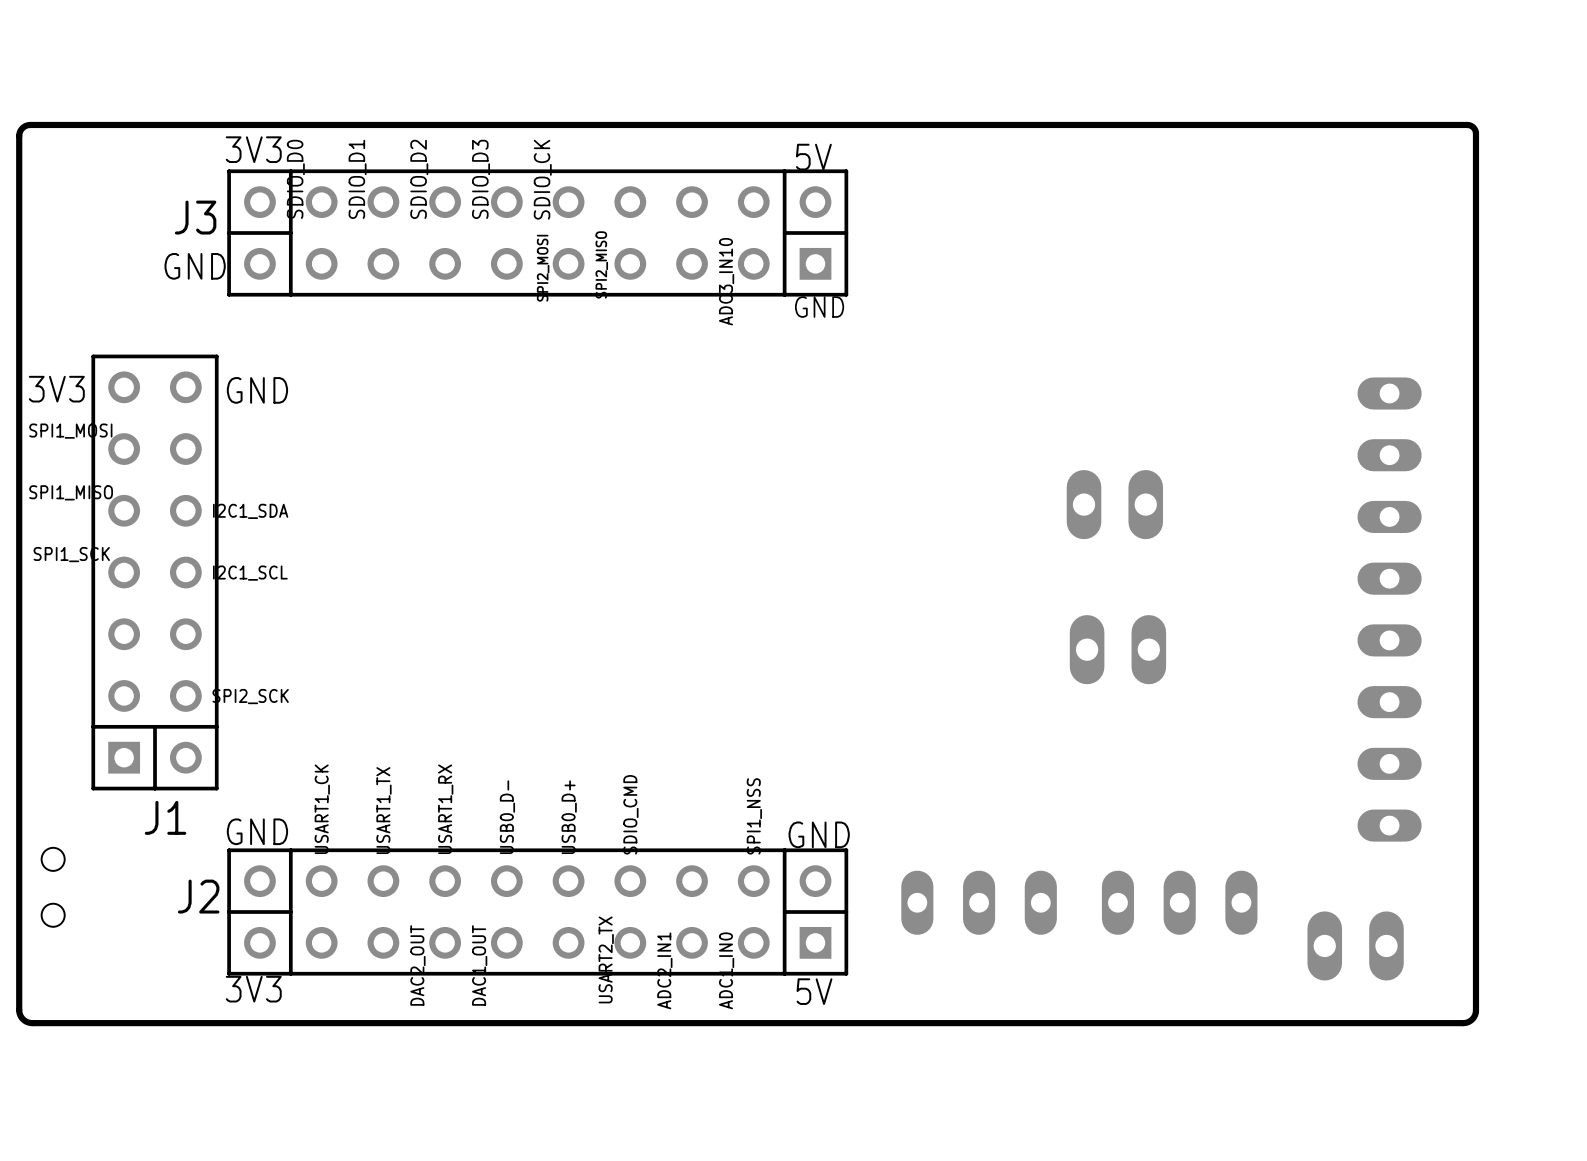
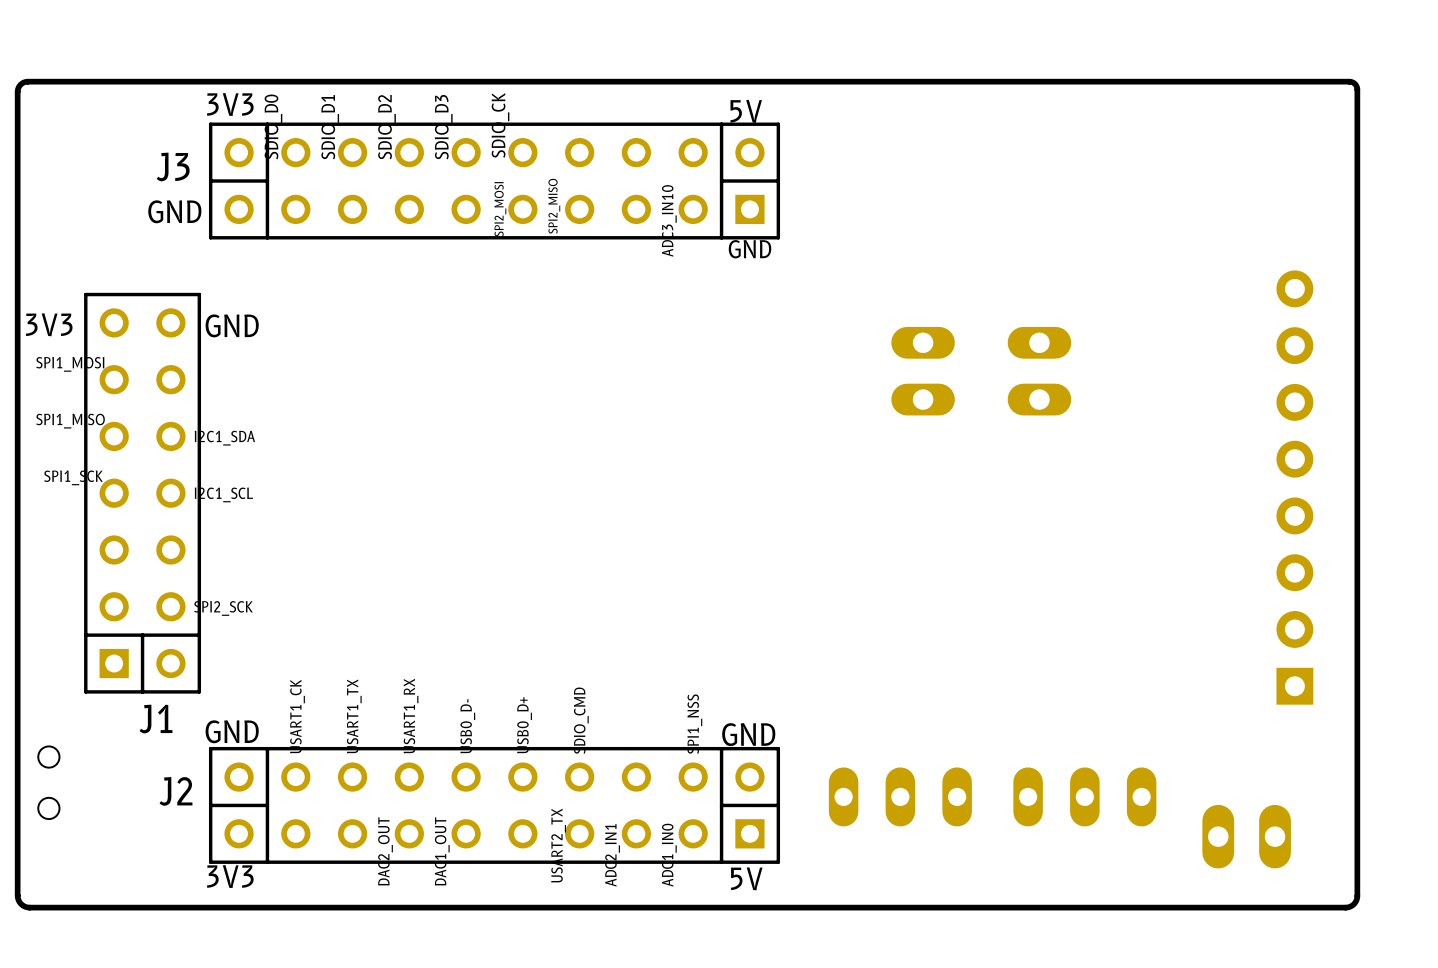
part: none -> (923, 371)
part: none -> (1039, 371)
part: (1114, 504) -> none
part: none -> (1294, 487)
part: (1389, 609) -> none
part: (1117, 649) -> none

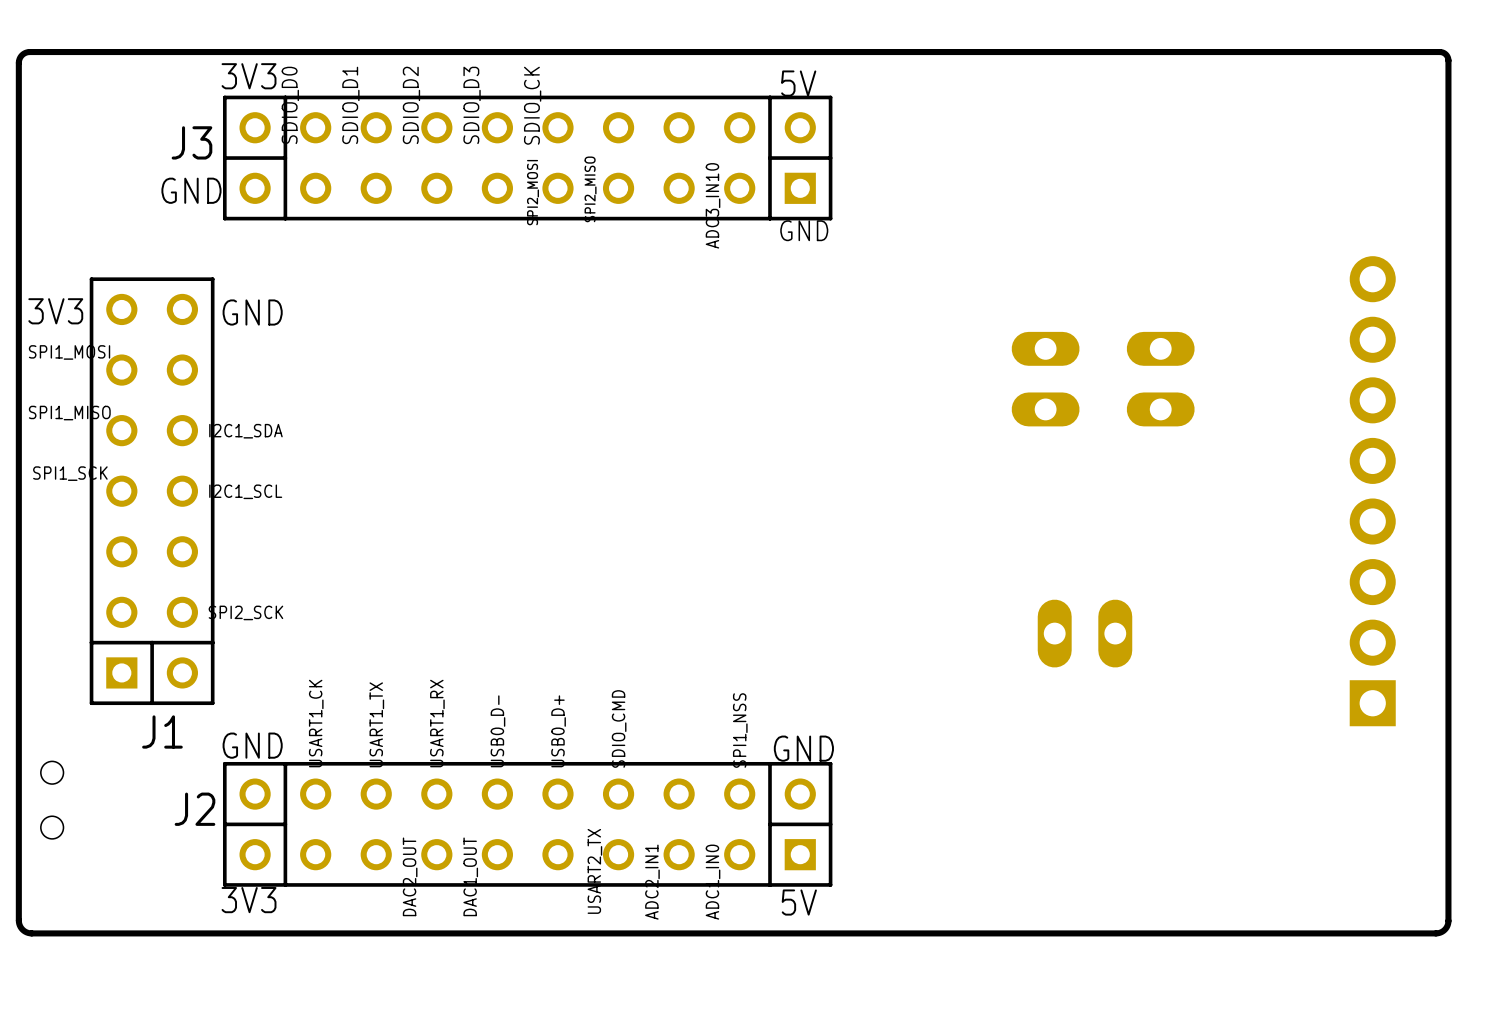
part footprint: [1276, 270, 1314, 705] -> [1349, 256, 1396, 727]
part: (923, 371) -> none
part: (1039, 371) -> none
part: none -> (1045, 379)
part: none -> (1160, 379)
part: none -> (1084, 633)
part: (900, 796) -> none
part: (1084, 796) -> none
part: (1246, 836) -> none

